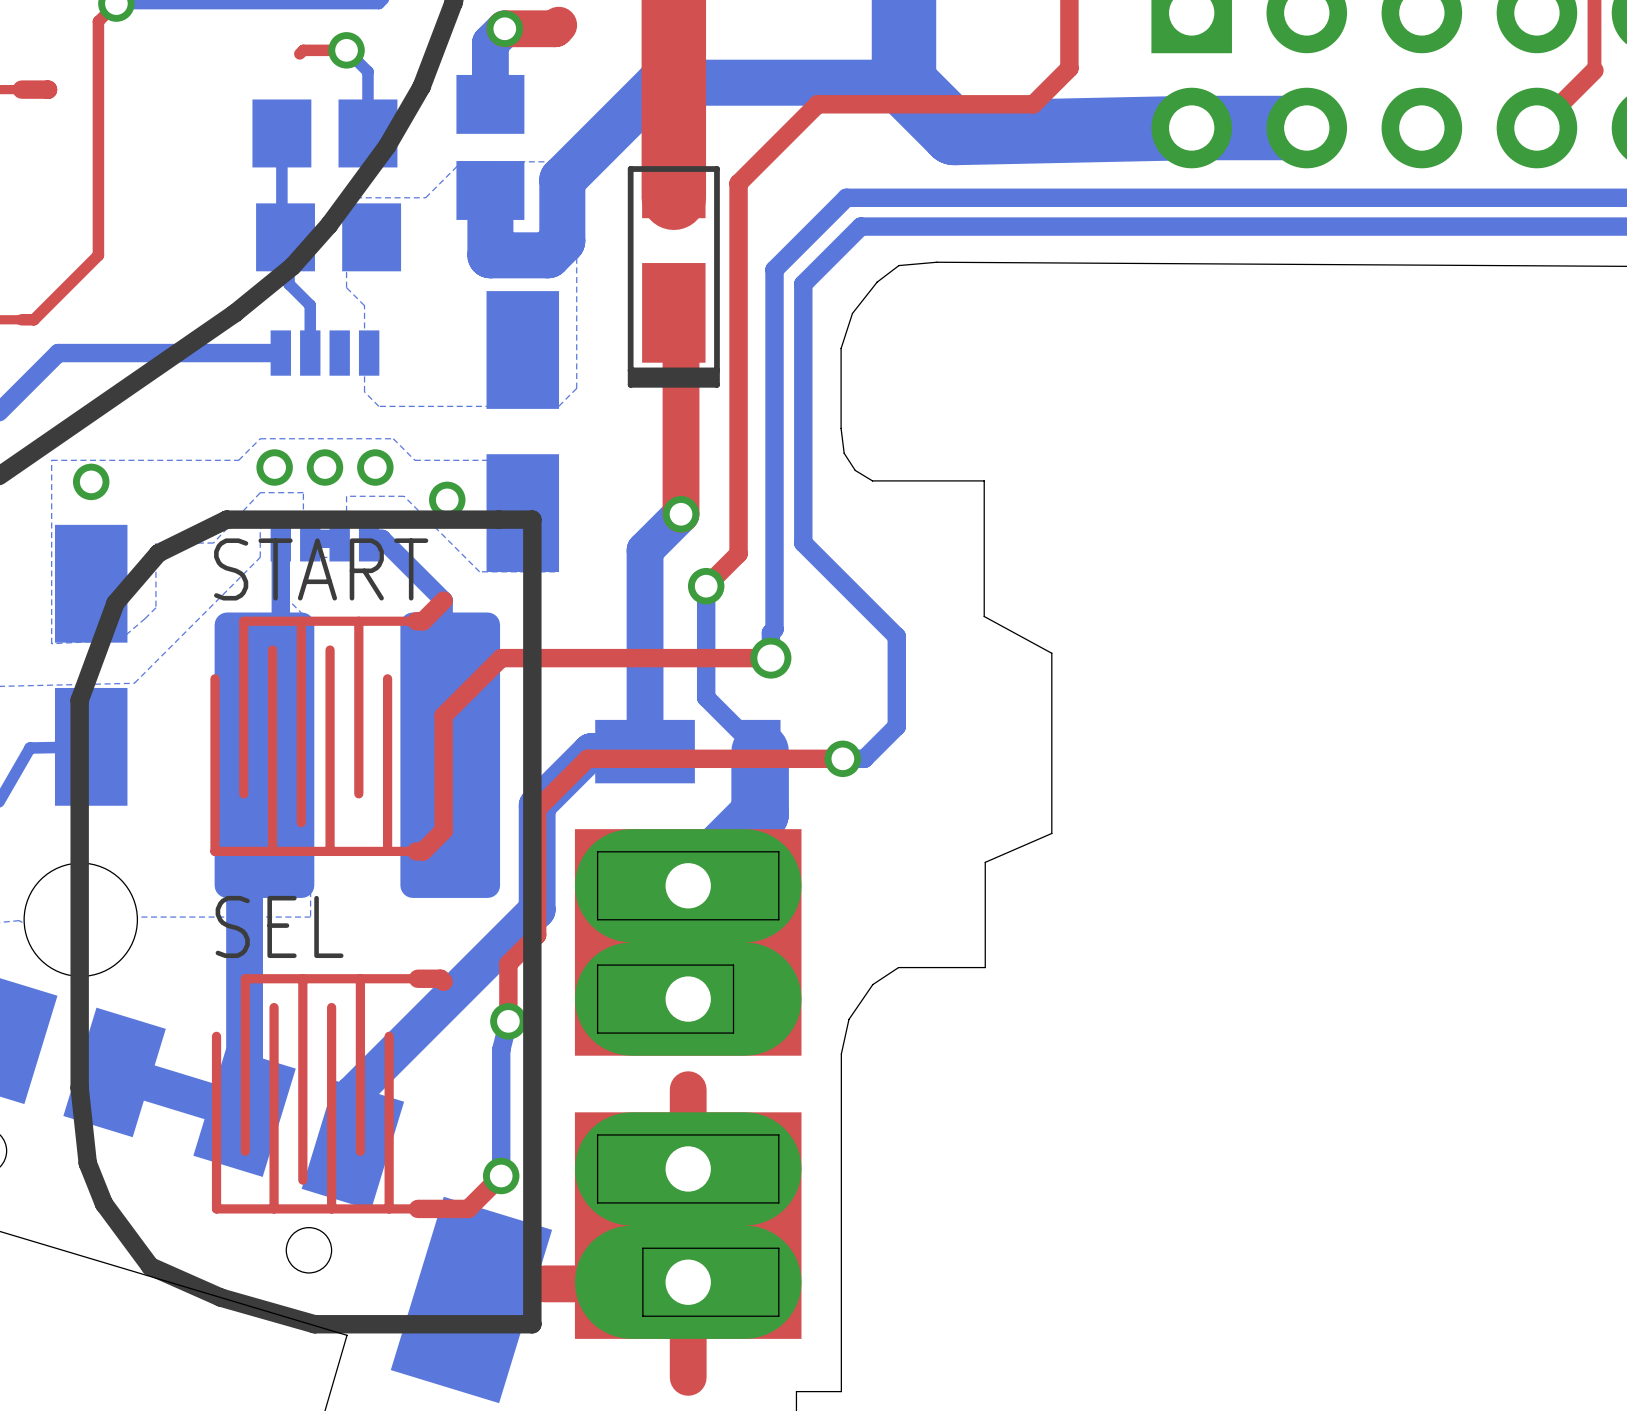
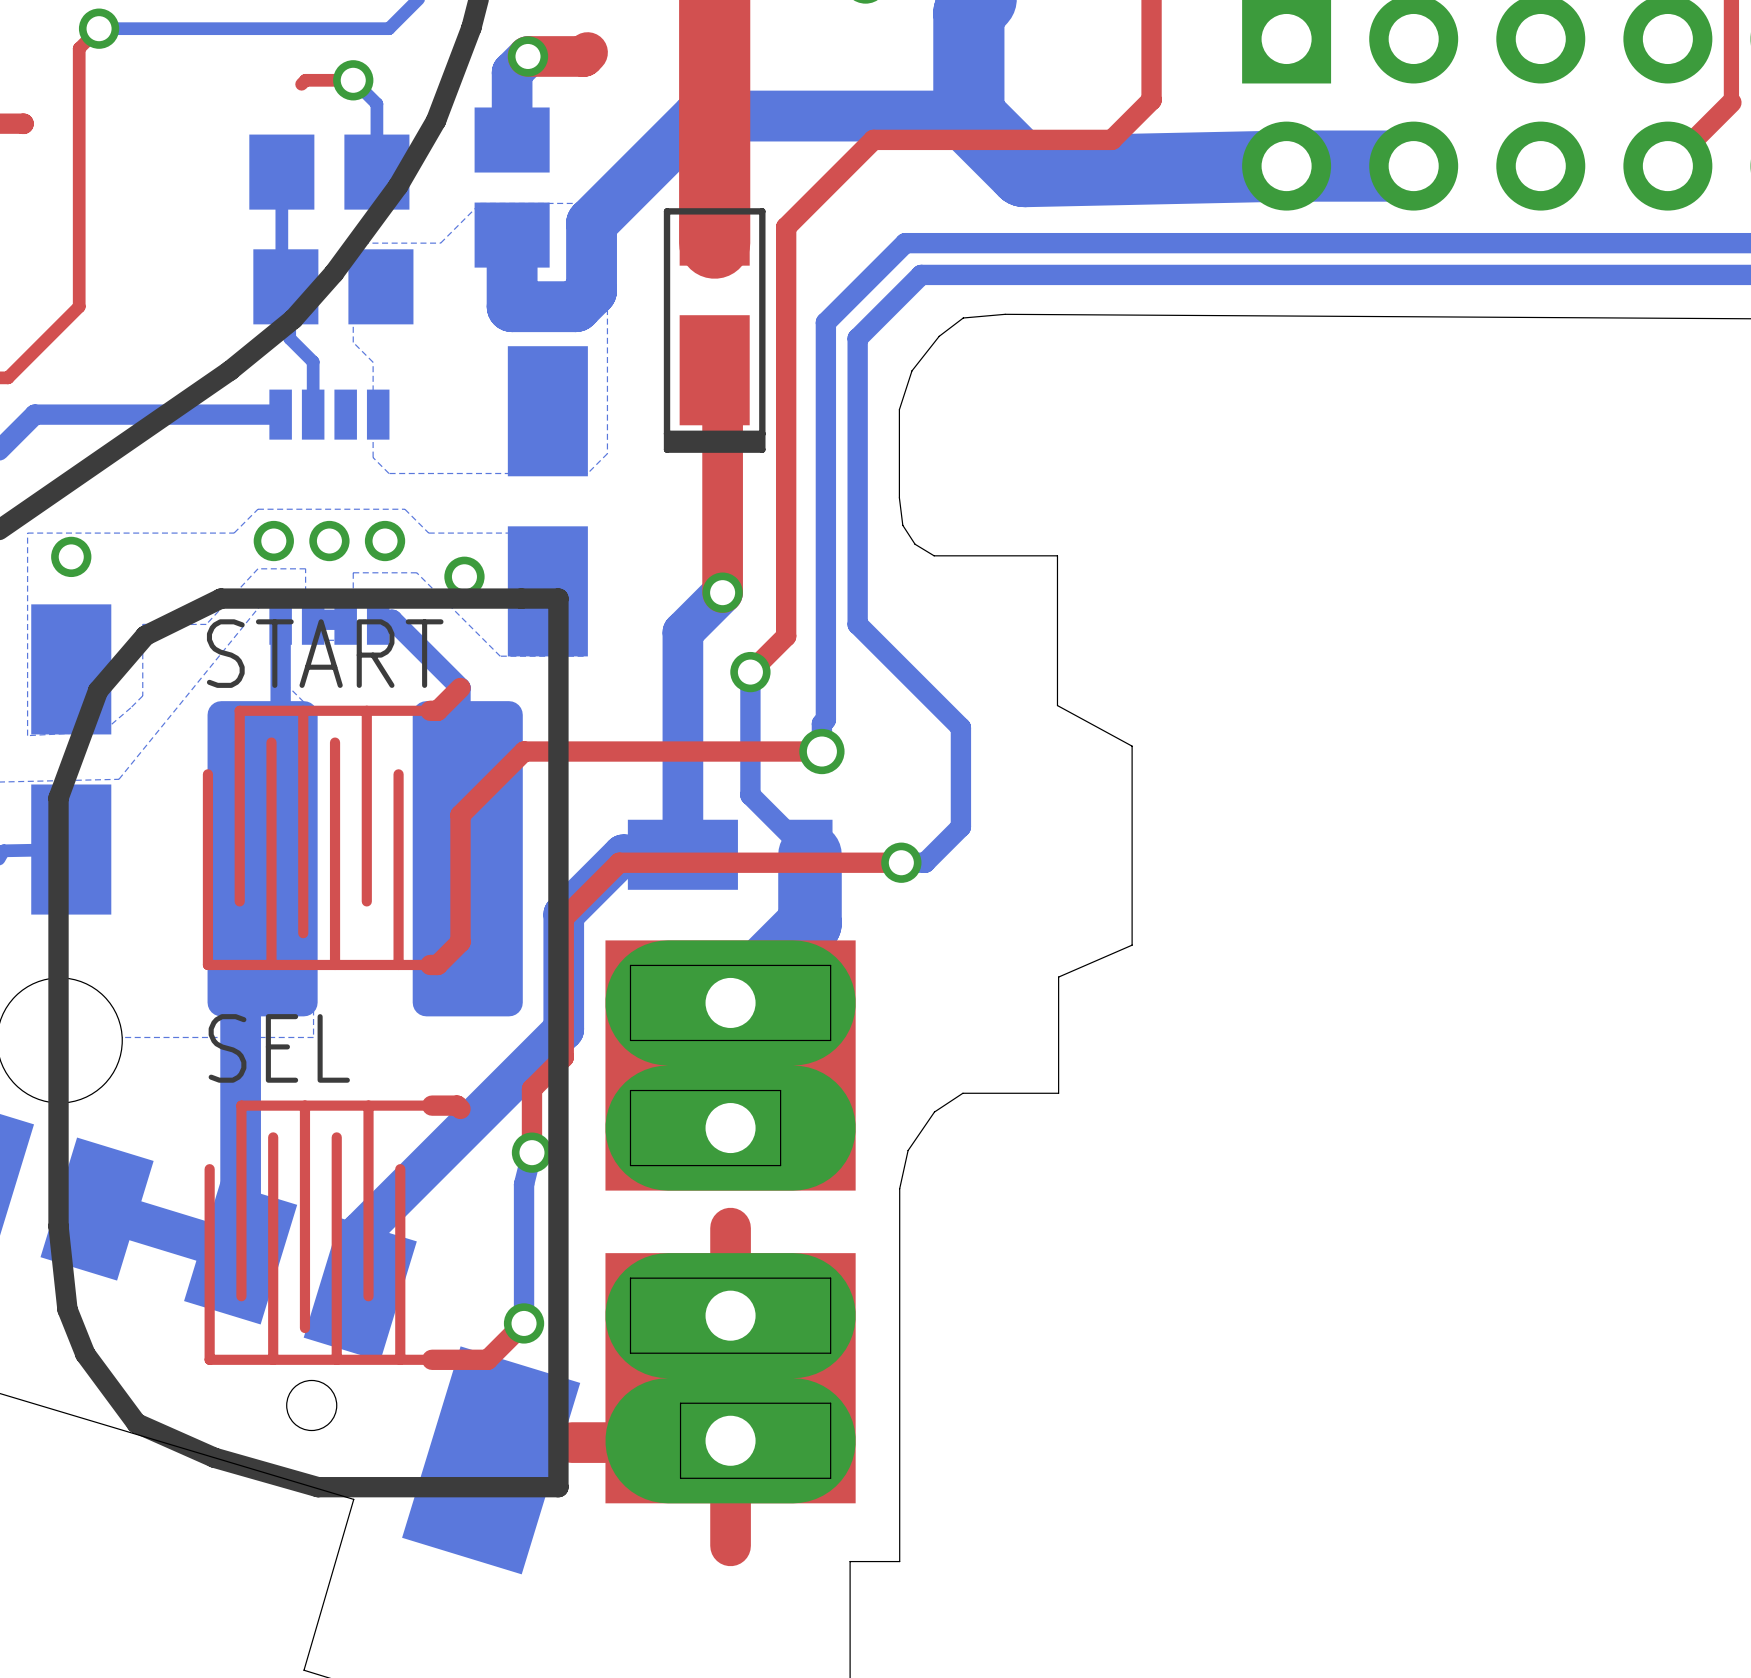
bottom zone outline: (260, 528) (260, 557) (134, 683) -> (257, 608) (118, 779)

